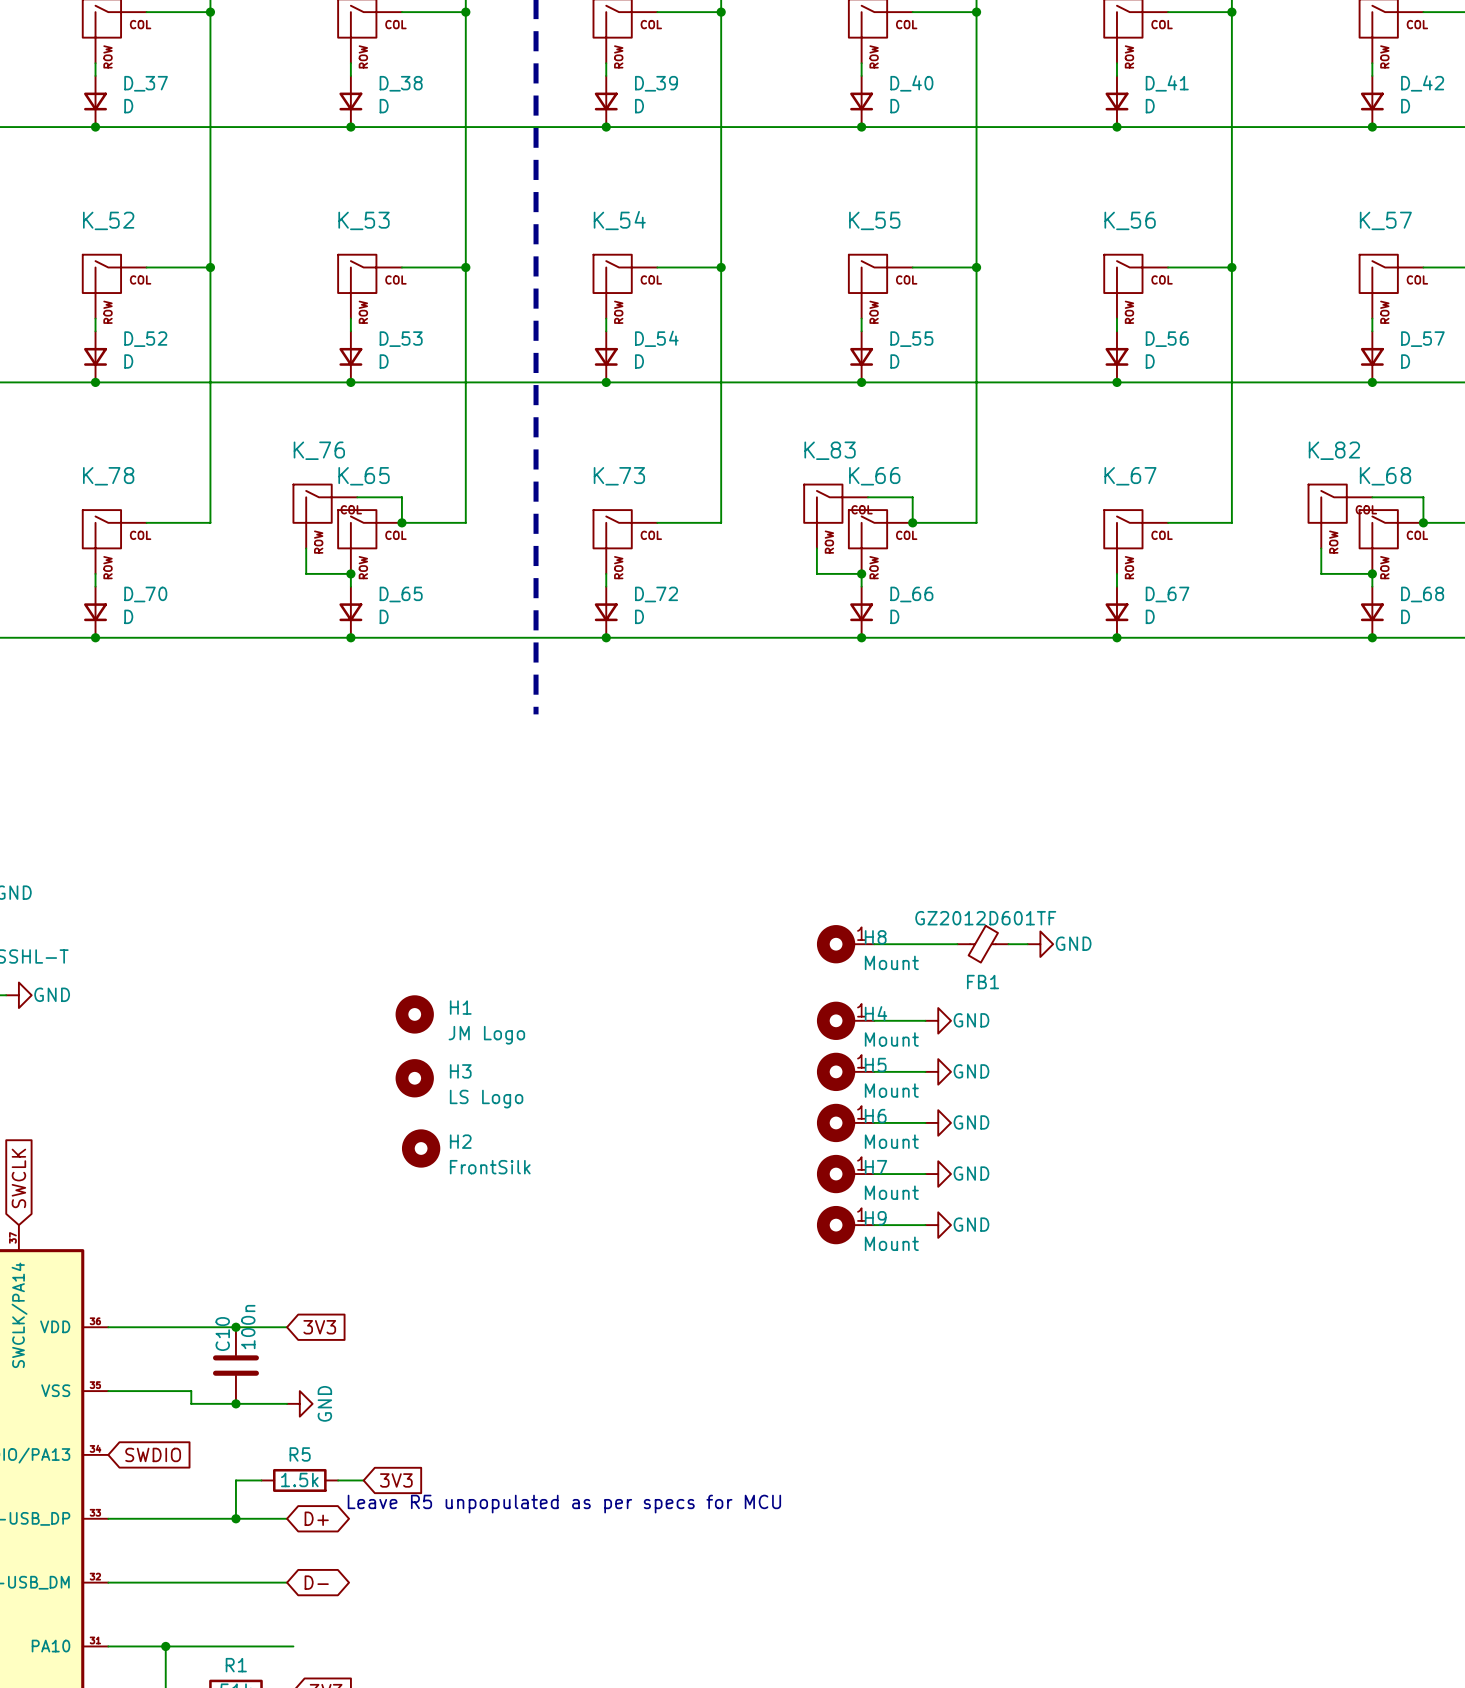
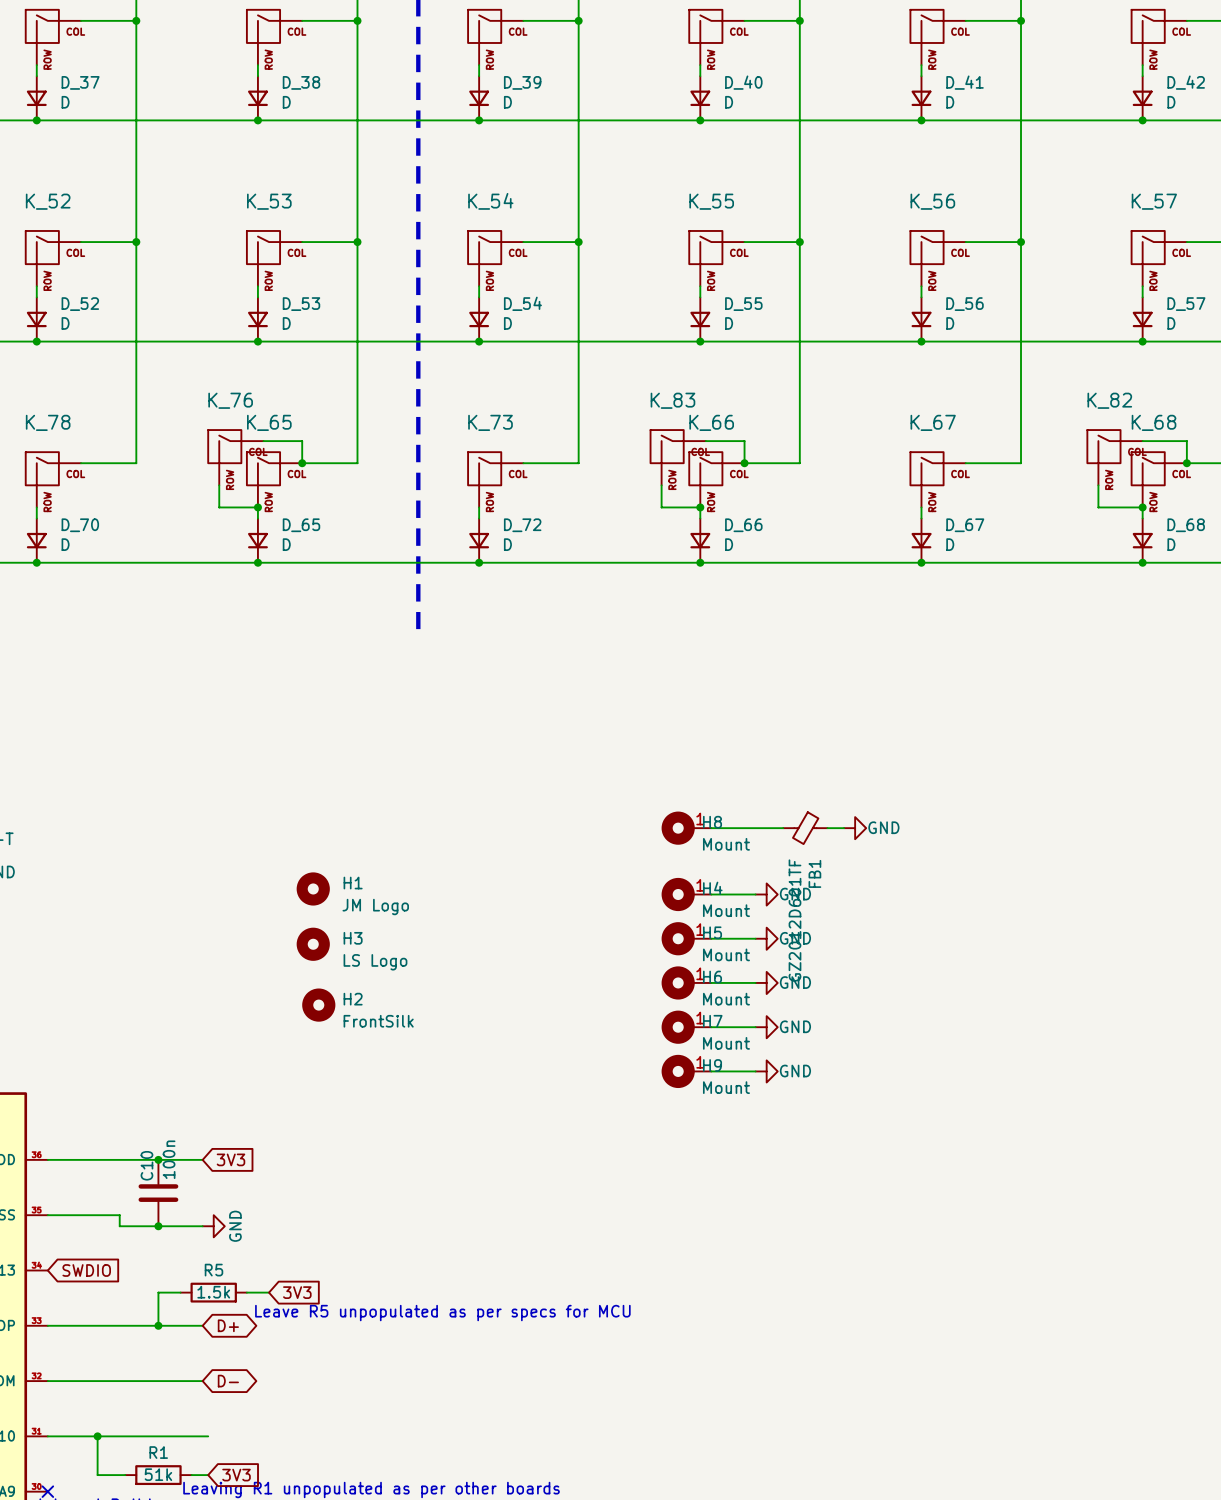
FB1 value rotation: 0° (985, 918) -> 90° counterclockwise (794, 920)
FB1 name rotation: 0° (983, 982) -> 90° counterclockwise (814, 873)

